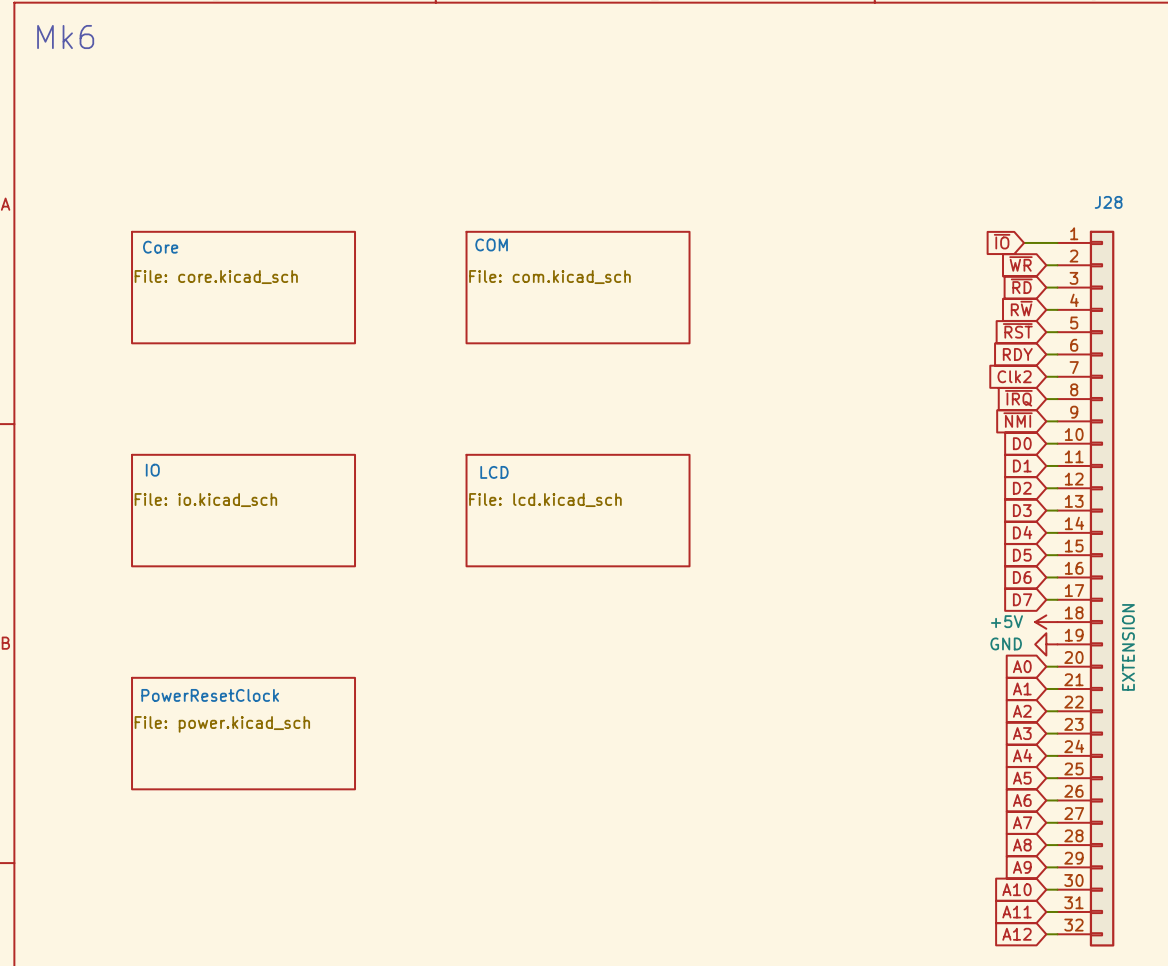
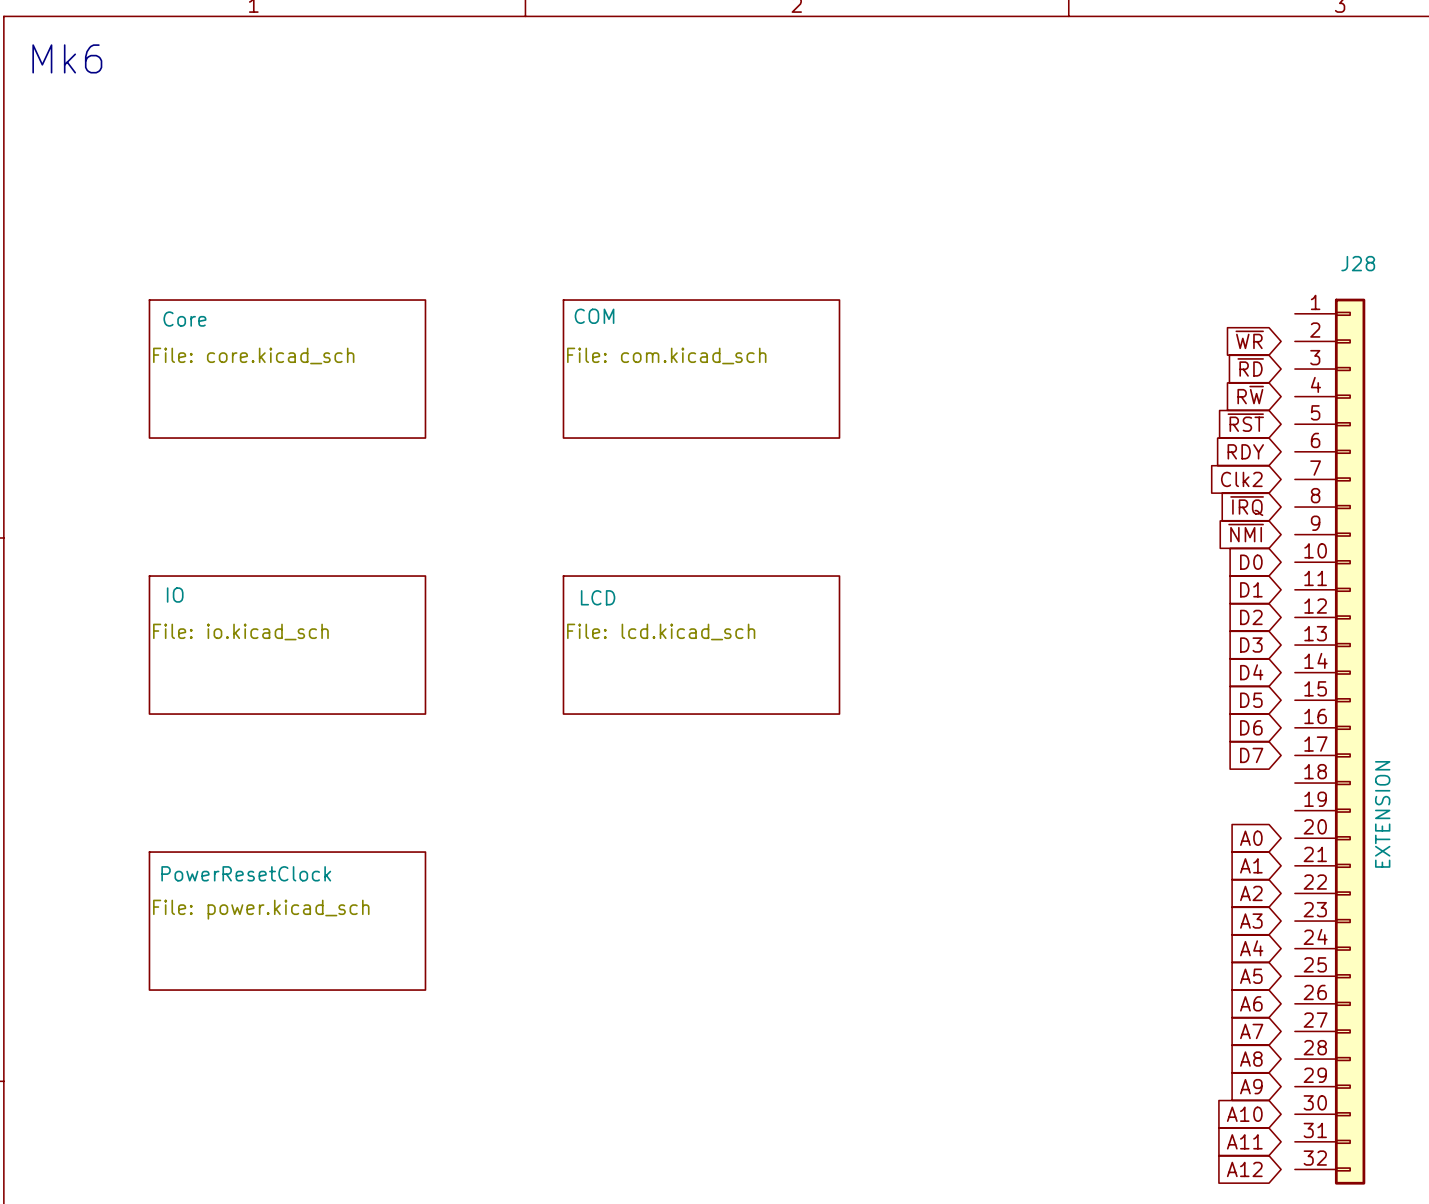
global label: ~{IO} (1002, 241) -> none
wire: (1024, 242) (1057, 242) -> none
wire: (1046, 265) (1057, 265) -> none
wire: (1046, 287) (1057, 287) -> none
wire: (1046, 309) (1057, 309) -> none
wire: (1046, 332) (1057, 332) -> none
wire: (1046, 354) (1057, 354) -> none
wire: (1046, 376) (1057, 376) -> none
wire: (1046, 399) (1057, 399) -> none
wire: (1046, 421) (1057, 421) -> none
wire: (1046, 443) (1057, 443) -> none
wire: (1046, 465) (1057, 465) -> none
wire: (1046, 488) (1057, 488) -> none
wire: (1046, 510) (1057, 510) -> none
wire: (1046, 532) (1057, 532) -> none
wire: (1046, 555) (1057, 555) -> none
wire: (1046, 577) (1057, 577) -> none
wire: (1046, 599) (1057, 599) -> none
power symbol: +5V (1046, 622) -> none
power symbol: GND (1046, 644) -> none
wire: (1046, 666) (1057, 666) -> none
wire: (1046, 688) (1057, 688) -> none
wire: (1046, 711) (1057, 711) -> none
wire: (1046, 733) (1057, 733) -> none
wire: (1046, 755) (1057, 755) -> none
wire: (1046, 778) (1057, 778) -> none
wire: (1046, 800) (1057, 800) -> none
wire: (1046, 822) (1057, 822) -> none
wire: (1046, 845) (1057, 845) -> none
wire: (1046, 867) (1057, 867) -> none
wire: (1046, 889) (1057, 889) -> none
wire: (1046, 911) (1057, 911) -> none
wire: (1046, 934) (1057, 934) -> none

